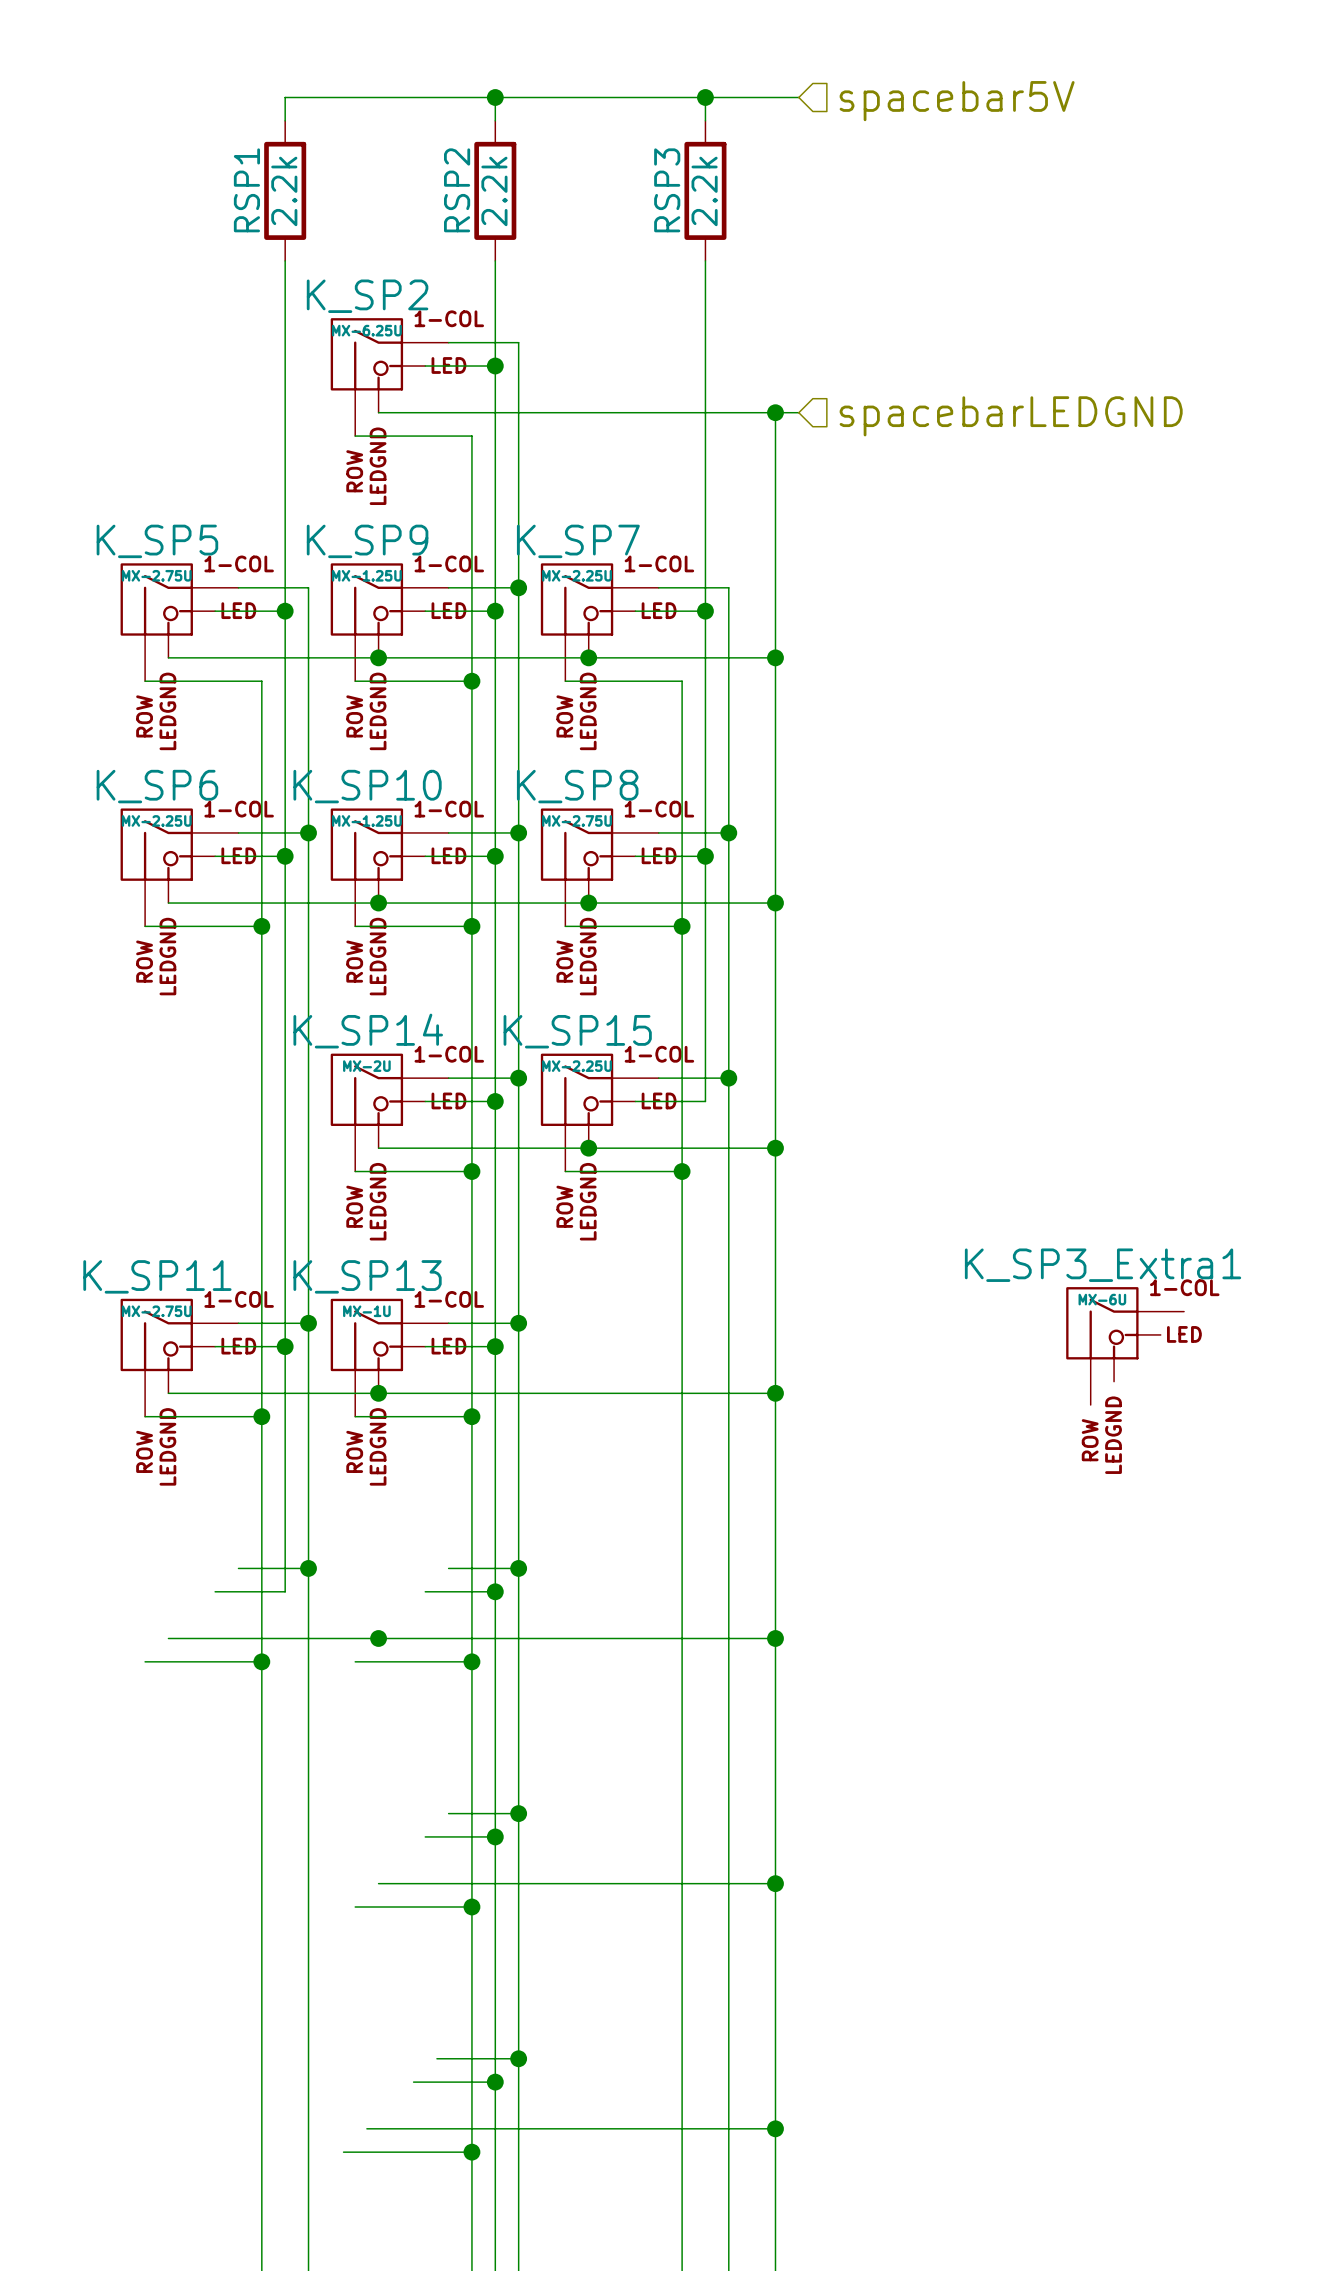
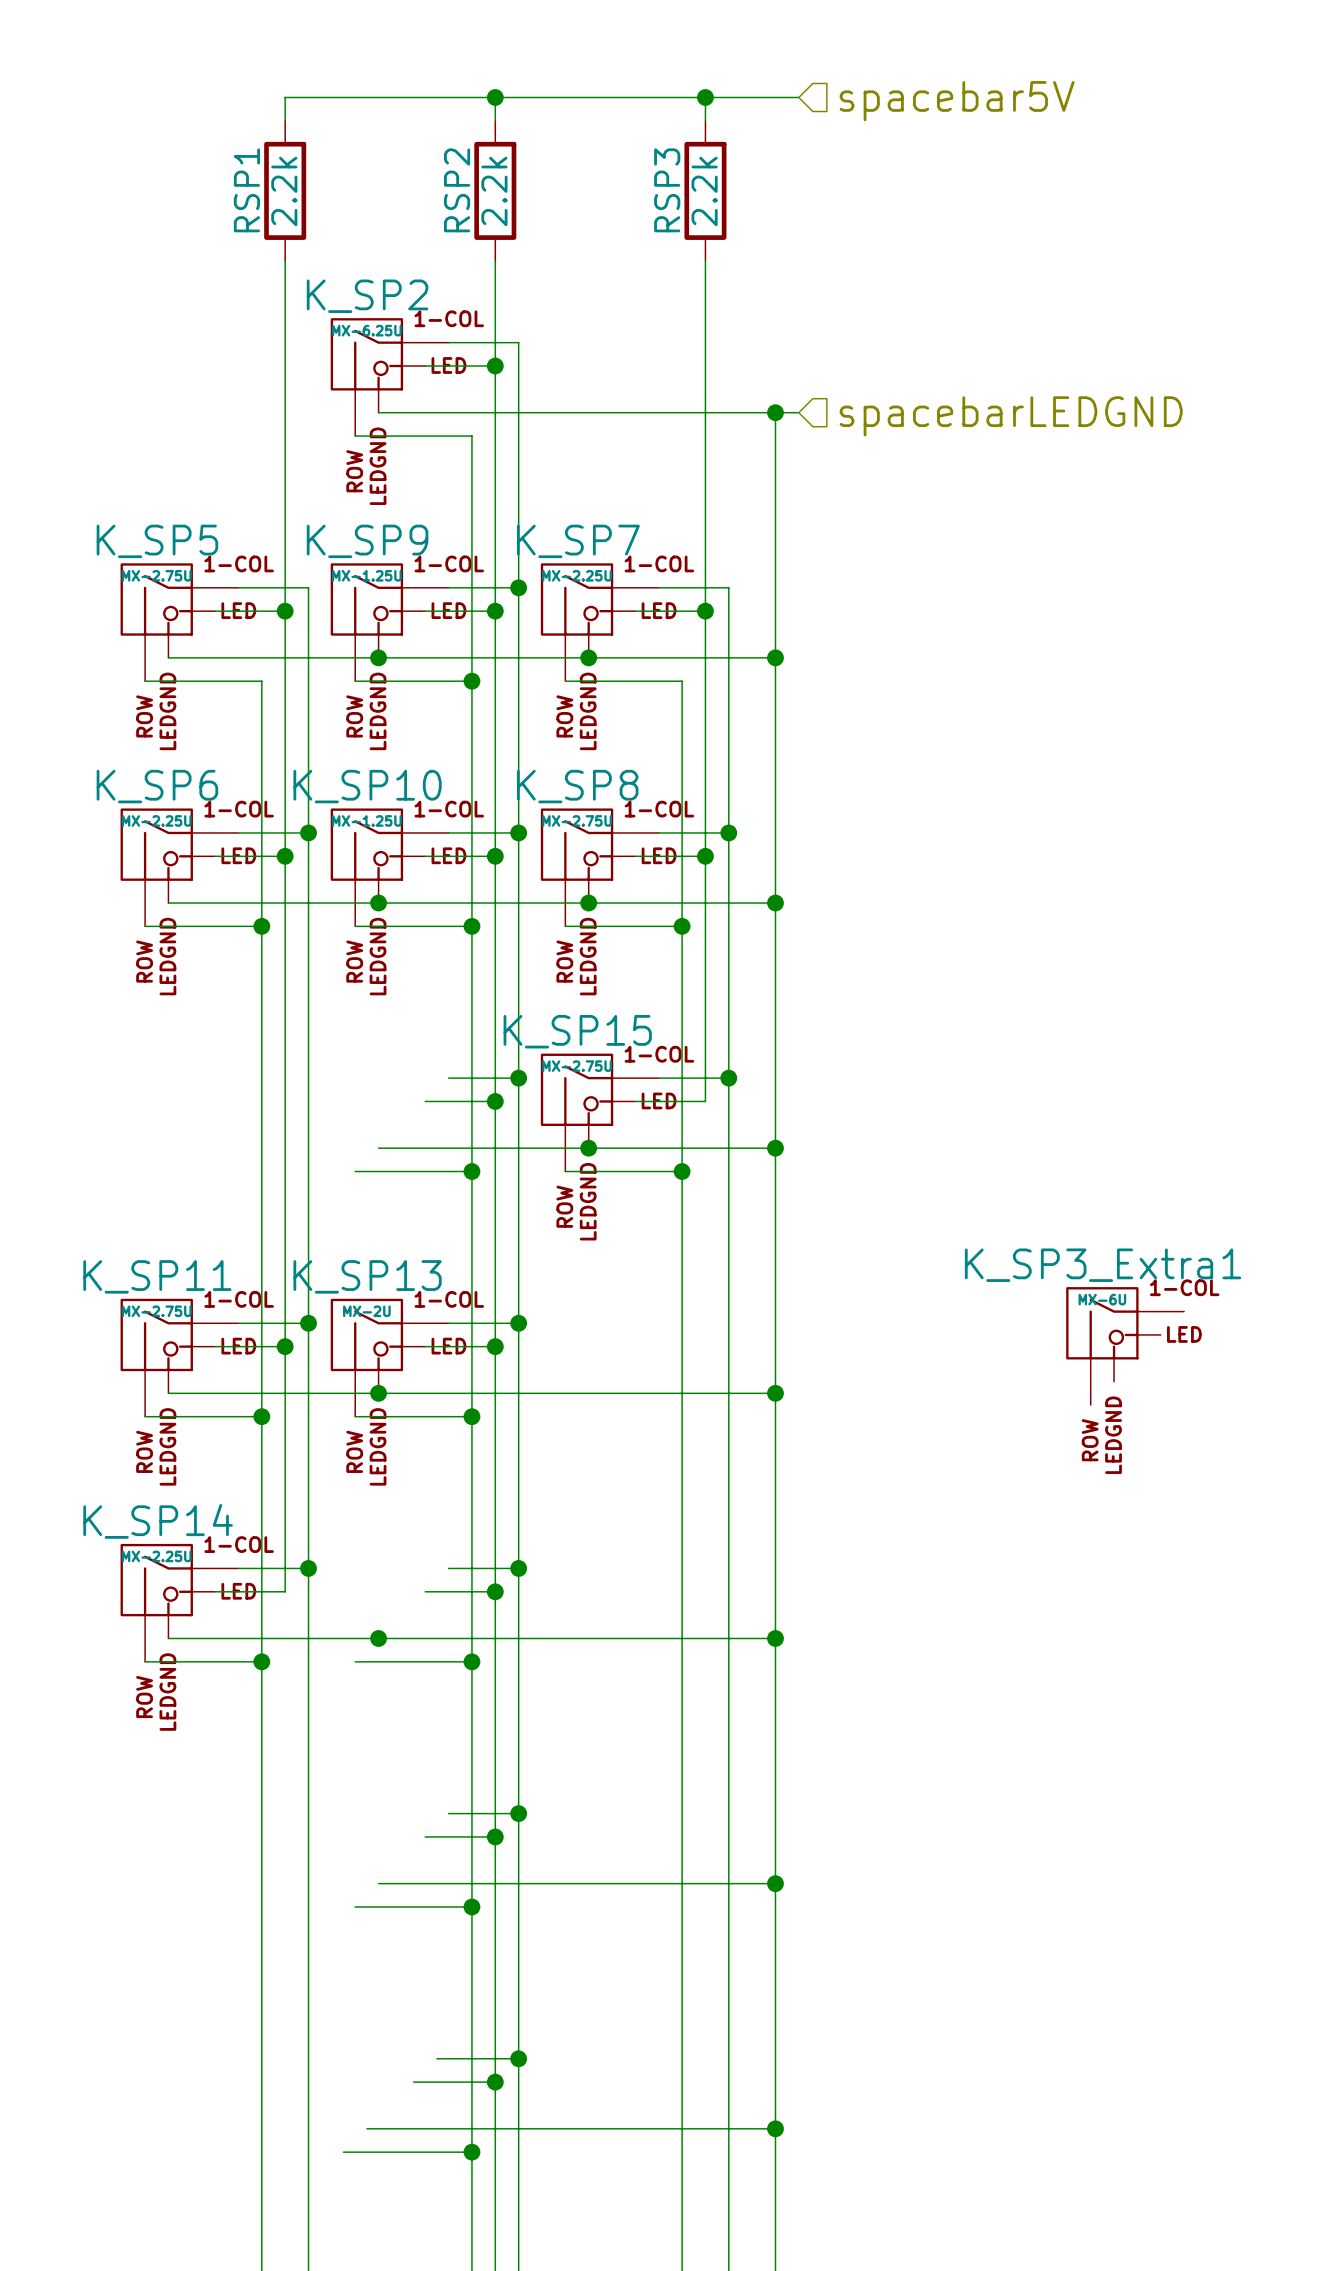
K_SP14 value: MX-2U (366, 1066) -> MX-2.25U (156, 1556)
K_SP15 value: MX-2.25U (577, 1066) -> MX-2.75U (577, 1066)
K_SP14 position: (389, 1112) -> (179, 1602)
K_SP13 value: MX-1U (366, 1311) -> MX-2U (366, 1311)

